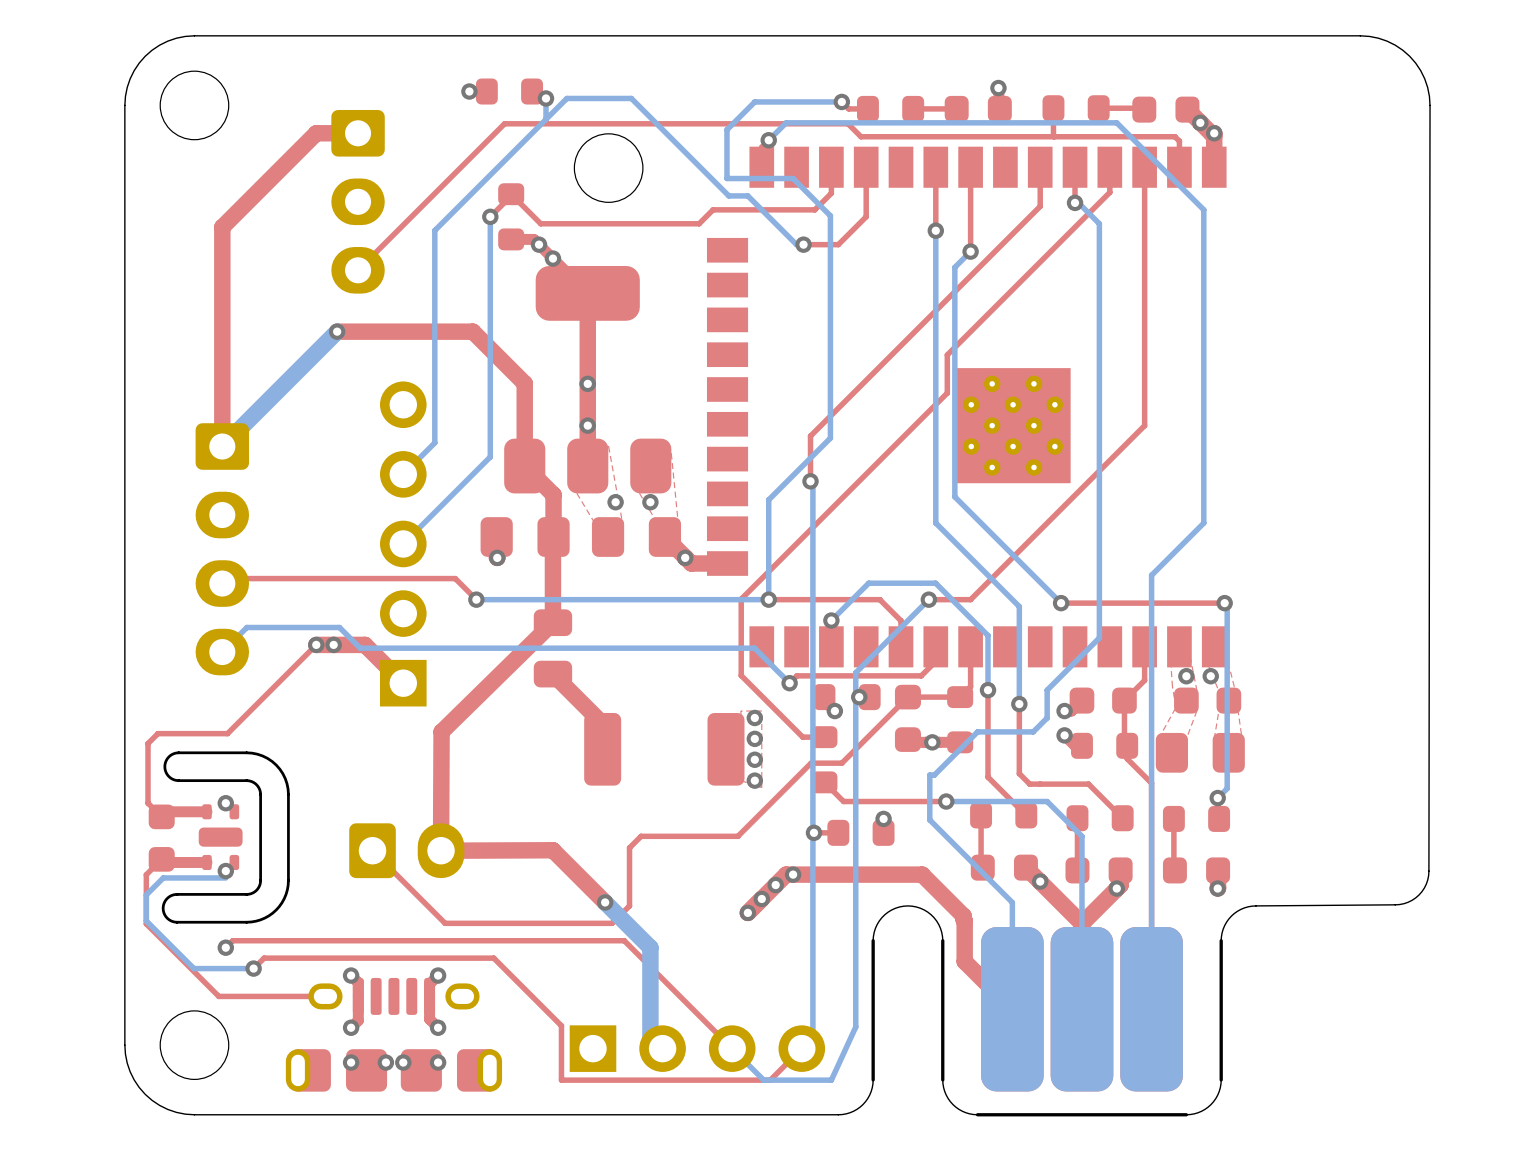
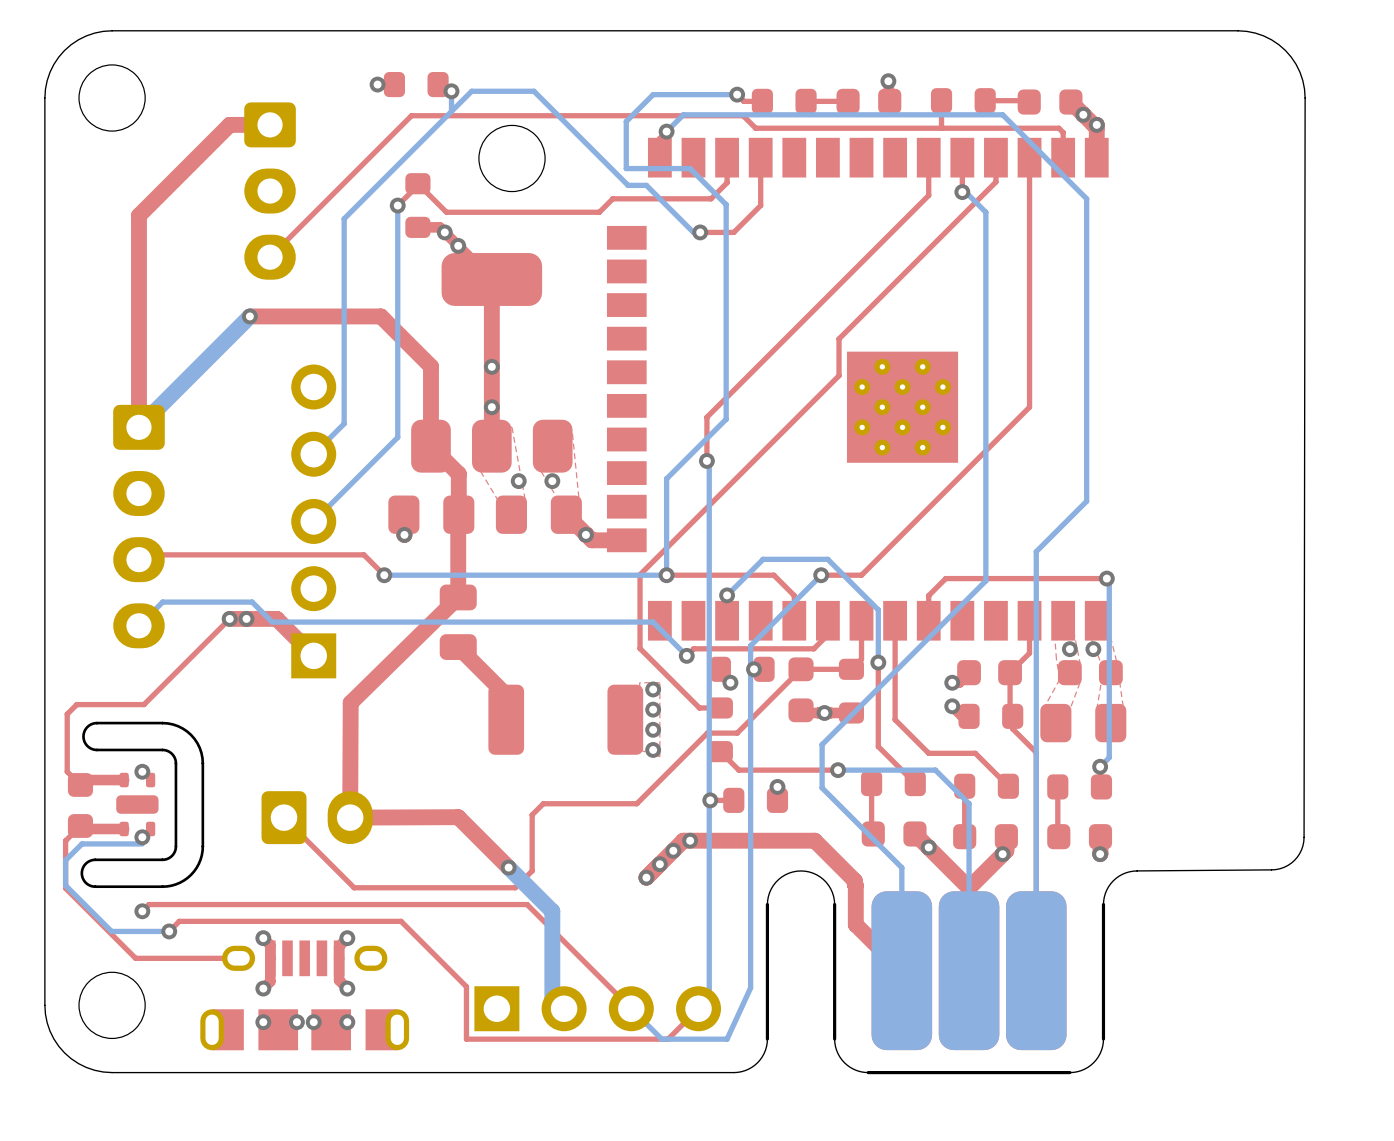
top track: (935, 167) (935, 230) -> none
top track: (970, 167) (970, 251) -> none
bottom track: (935, 230) (935, 523) (1019, 606) (1019, 704) -> none
via: (935, 230) -> none
bottom track: (970, 251) (954, 267) (954, 496) (1061, 603) -> none
via: (970, 251) -> none
top track: none -> (945, 578) (928, 595) (928, 620)
via: (1061, 603) -> none
bottom track: (1099, 605) (1099, 637) (1047, 690) (1047, 717) (1033, 731) (977, 731) (934, 775) (929, 775) -> (985, 580) (822, 744)
top track: (1019, 704) (1019, 773) (1029, 784) (1040, 784) -> (895, 620) (895, 719) (928, 753)
via: (1019, 704) -> none
part footprint: [285, 977, 503, 1092] -> [200, 940, 410, 1051]

